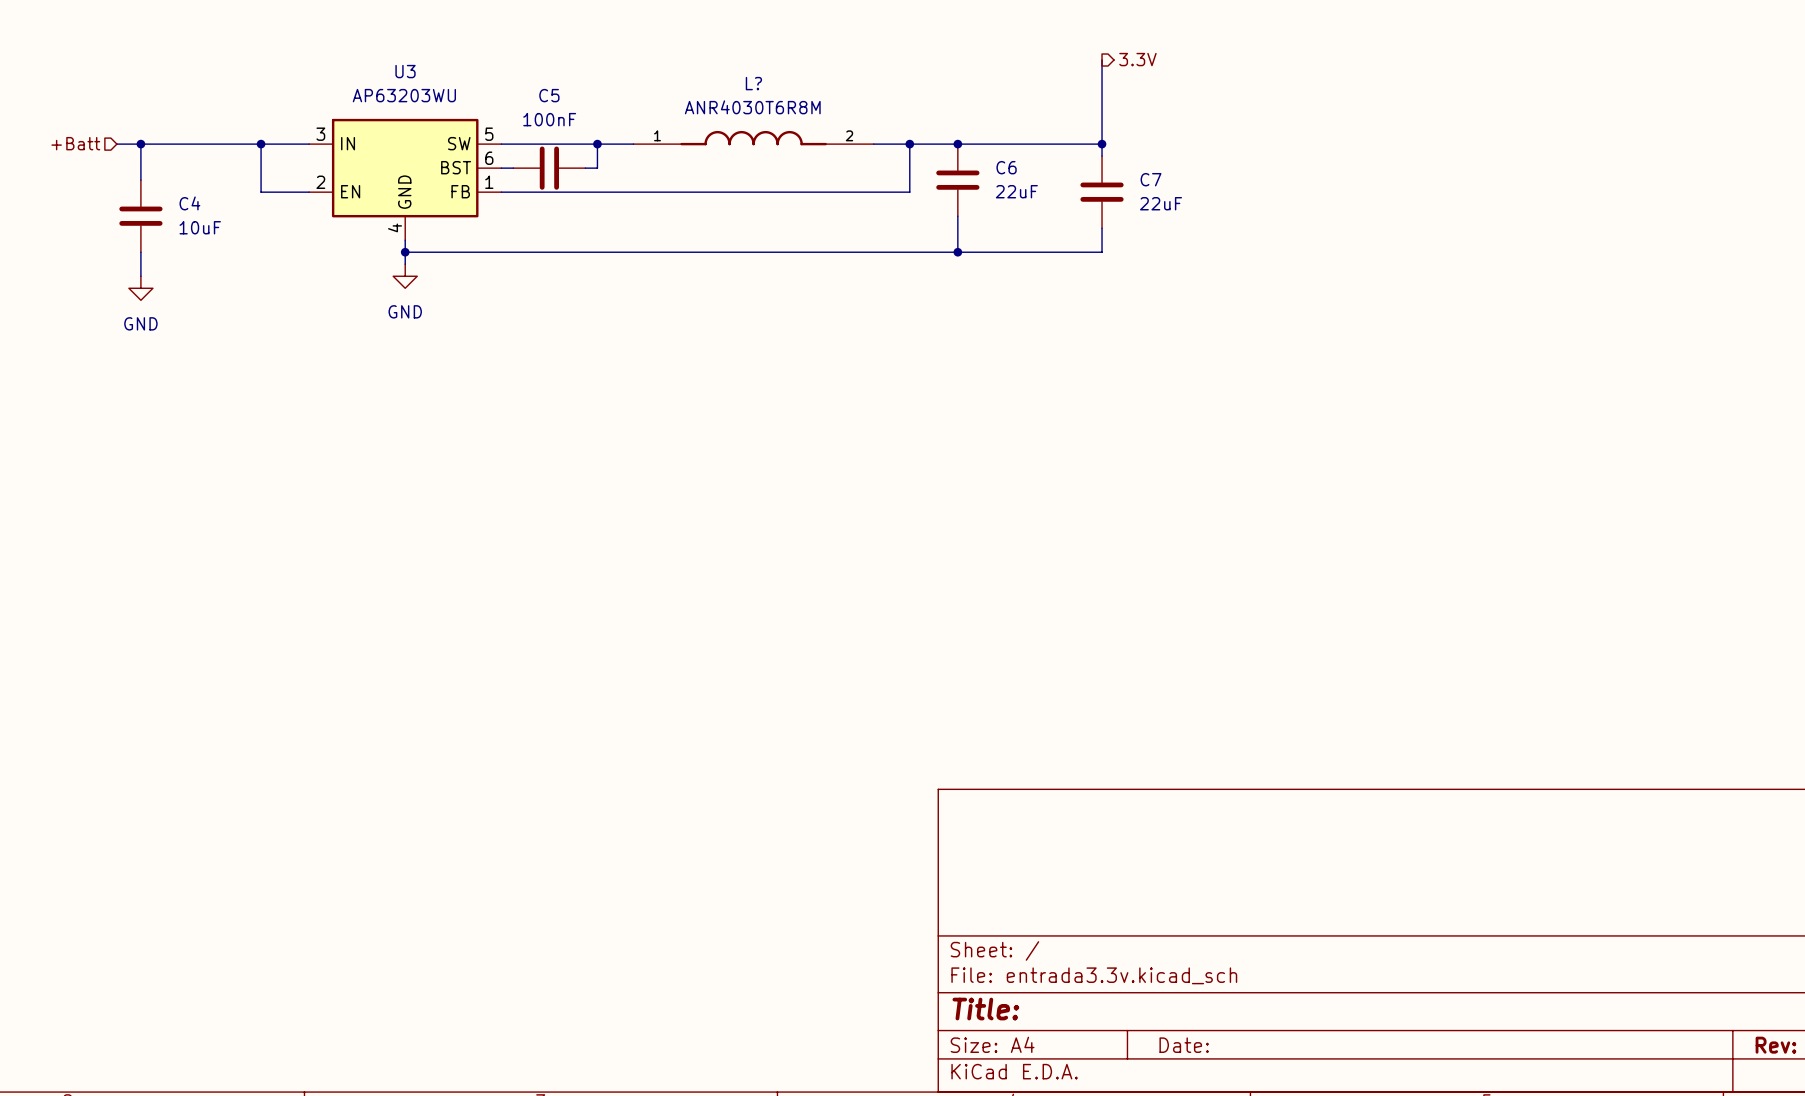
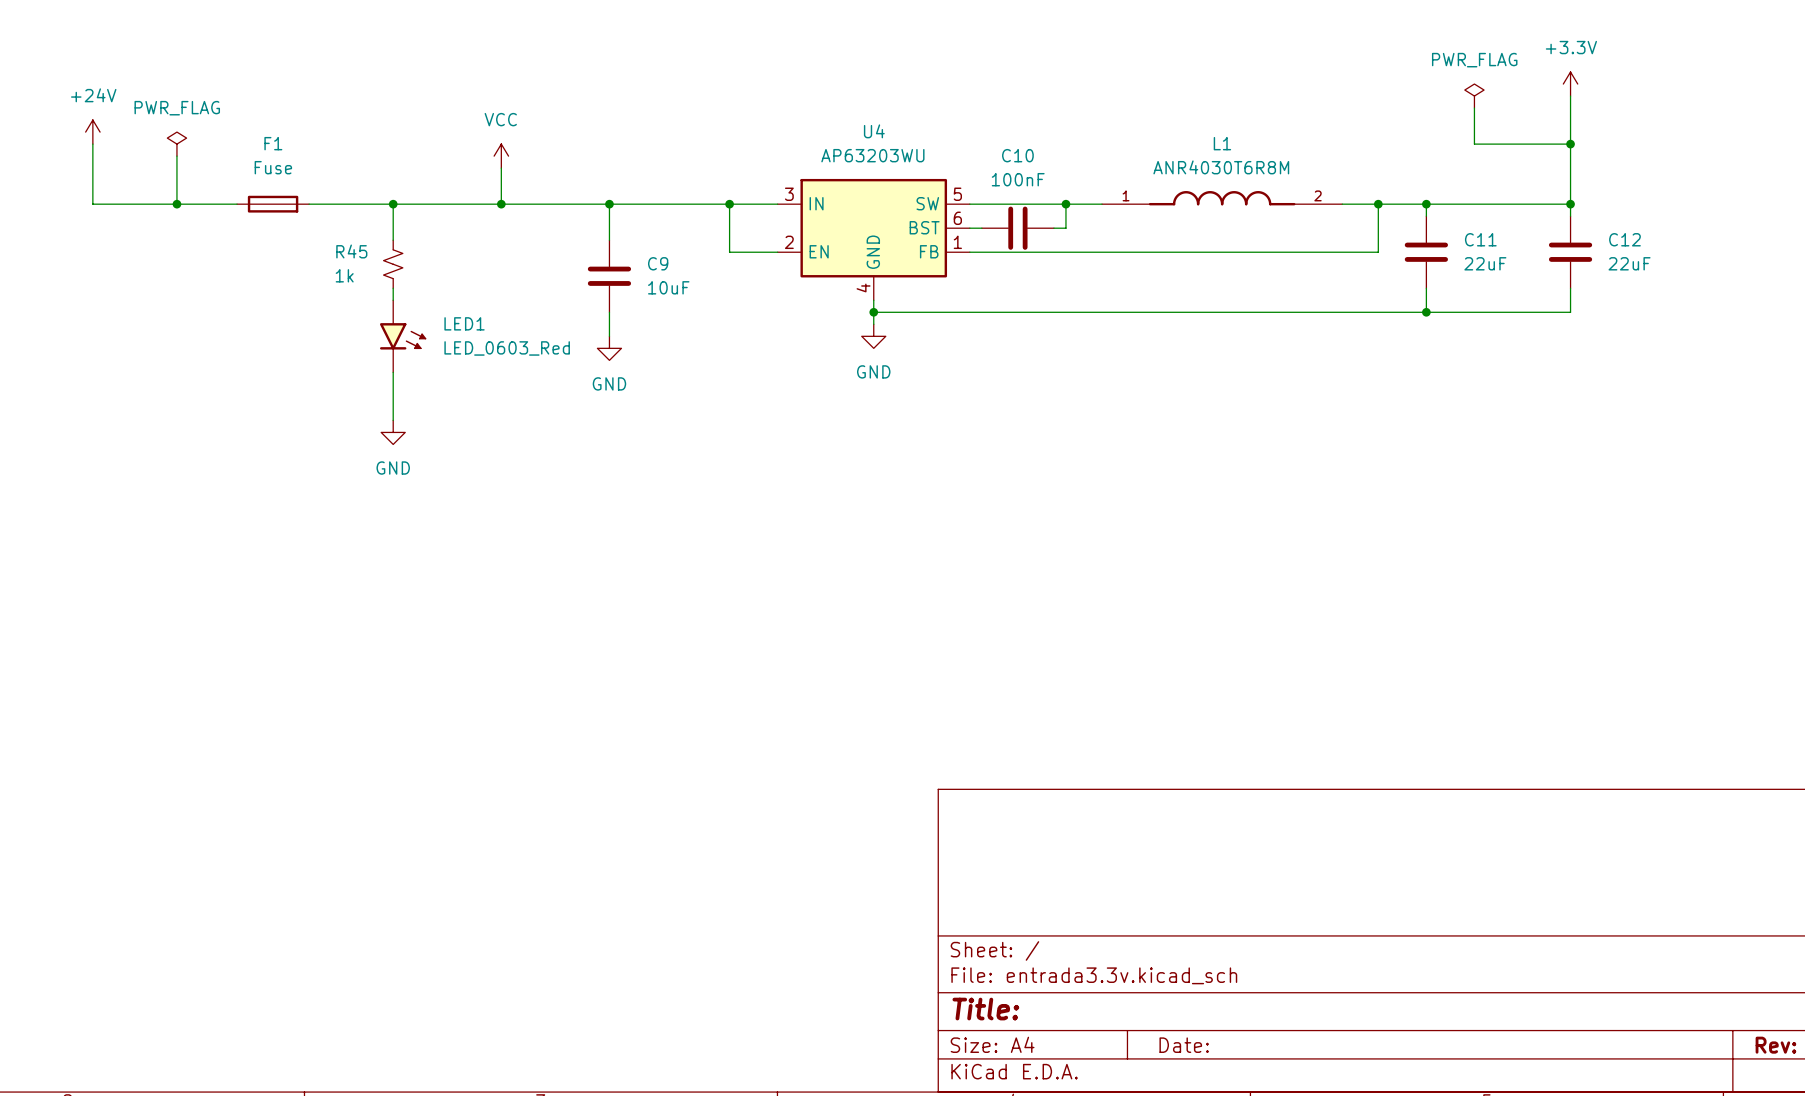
hierarchical label: 3.3V (1137, 59) -> none
wire: (1102, 60) (1102, 156) -> none
power symbol: none -> +3.3V (1570, 84)
power symbol: none -> PWR_FLAG (1474, 96)
wire: none -> (1570, 96) (1570, 216)
wire: none -> (1474, 108) (1474, 144) (1570, 144)
power symbol: none -> +24V (92, 132)
L?: ANR4030T6R8M (753, 138) -> none
hierarchical label: +Batt (75, 143) -> none
wire: none -> (92, 144) (92, 204) (237, 204)
wire: (116, 144) (309, 144) -> none
wire: (140, 144) (140, 180) -> none
junction: (140, 144) -> none
power symbol: none -> PWR_FLAG (176, 144)
wire: (261, 144) (261, 192) (309, 192) -> none
junction: (261, 144) -> none
wire: (501, 144) (633, 144) -> none
wire: (597, 144) (597, 168) (585, 168) -> none
junction: (597, 144) -> none
wire: (873, 144) (1102, 144) -> none
wire: (909, 144) (909, 192) (501, 192) -> none
junction: (909, 144) -> none
junction: (957, 144) -> none
junction: (1102, 144) -> none
junction: none -> (1570, 144)
wire: none -> (176, 156) (176, 204)
power symbol: none -> VCC (501, 156)
wire: (501, 168) (513, 168) -> (501, 168) (501, 204)
C5: 100nF (549, 168) -> none
U3: AP63203WU (405, 179) -> none
C6: 22uF (957, 180) -> none
C7: 22uF (1102, 192) -> none
L1: none -> ANR4030T6R8M (1222, 198)
junction: none -> (176, 204)
F1: none -> Fuse (273, 204)
wire: none -> (309, 204) (777, 204)
wire: none -> (393, 204) (393, 240)
junction: none -> (501, 204)
wire: none -> (609, 204) (609, 240)
junction: none -> (609, 204)
junction: none -> (729, 204)
wire: none -> (969, 204) (1102, 204)
wire: none -> (1065, 204) (1065, 228) (1053, 228)
junction: none -> (1065, 204)
wire: none -> (1342, 204) (1570, 204)
junction: none -> (1378, 204)
wire: none -> (1426, 204) (1426, 216)
junction: none -> (1426, 204)
junction: none -> (1570, 204)
C4: 10uF (140, 216) -> none
wire: none -> (969, 228) (981, 228)
C10: none -> 100nF (1017, 228)
wire: (1102, 228) (1102, 252) -> (1378, 204) (1378, 252) (1102, 252)
U4: none -> AP63203WU (873, 239)
wire: (405, 240) (405, 264) -> (609, 312) (609, 336)
wire: (140, 252) (140, 276) -> none
wire: (405, 252) (729, 252) -> (729, 204) (729, 252)
junction position: (405, 252) -> (393, 204)
junction: (957, 252) -> none
C11: none -> 22uF (1426, 252)
C12: none -> 22uF (1570, 252)
R45: none -> 1k (393, 264)
power symbol: GND (405, 276) -> none
C9: none -> 10uF (609, 276)
power symbol: GND (140, 288) -> none
wire: none -> (393, 288) (393, 300)
wire: none -> (1426, 288) (1426, 312)
wire: none -> (1570, 288) (1570, 312) (873, 312)
wire: none -> (873, 300) (873, 324)
junction: none -> (873, 312)
junction: none -> (1426, 312)
LED1: none -> LED_0603_Red (403, 336)
power symbol: none -> GND (873, 336)
power symbol: none -> GND (609, 348)
wire: none -> (393, 372) (393, 420)
power symbol: none -> GND (393, 432)

